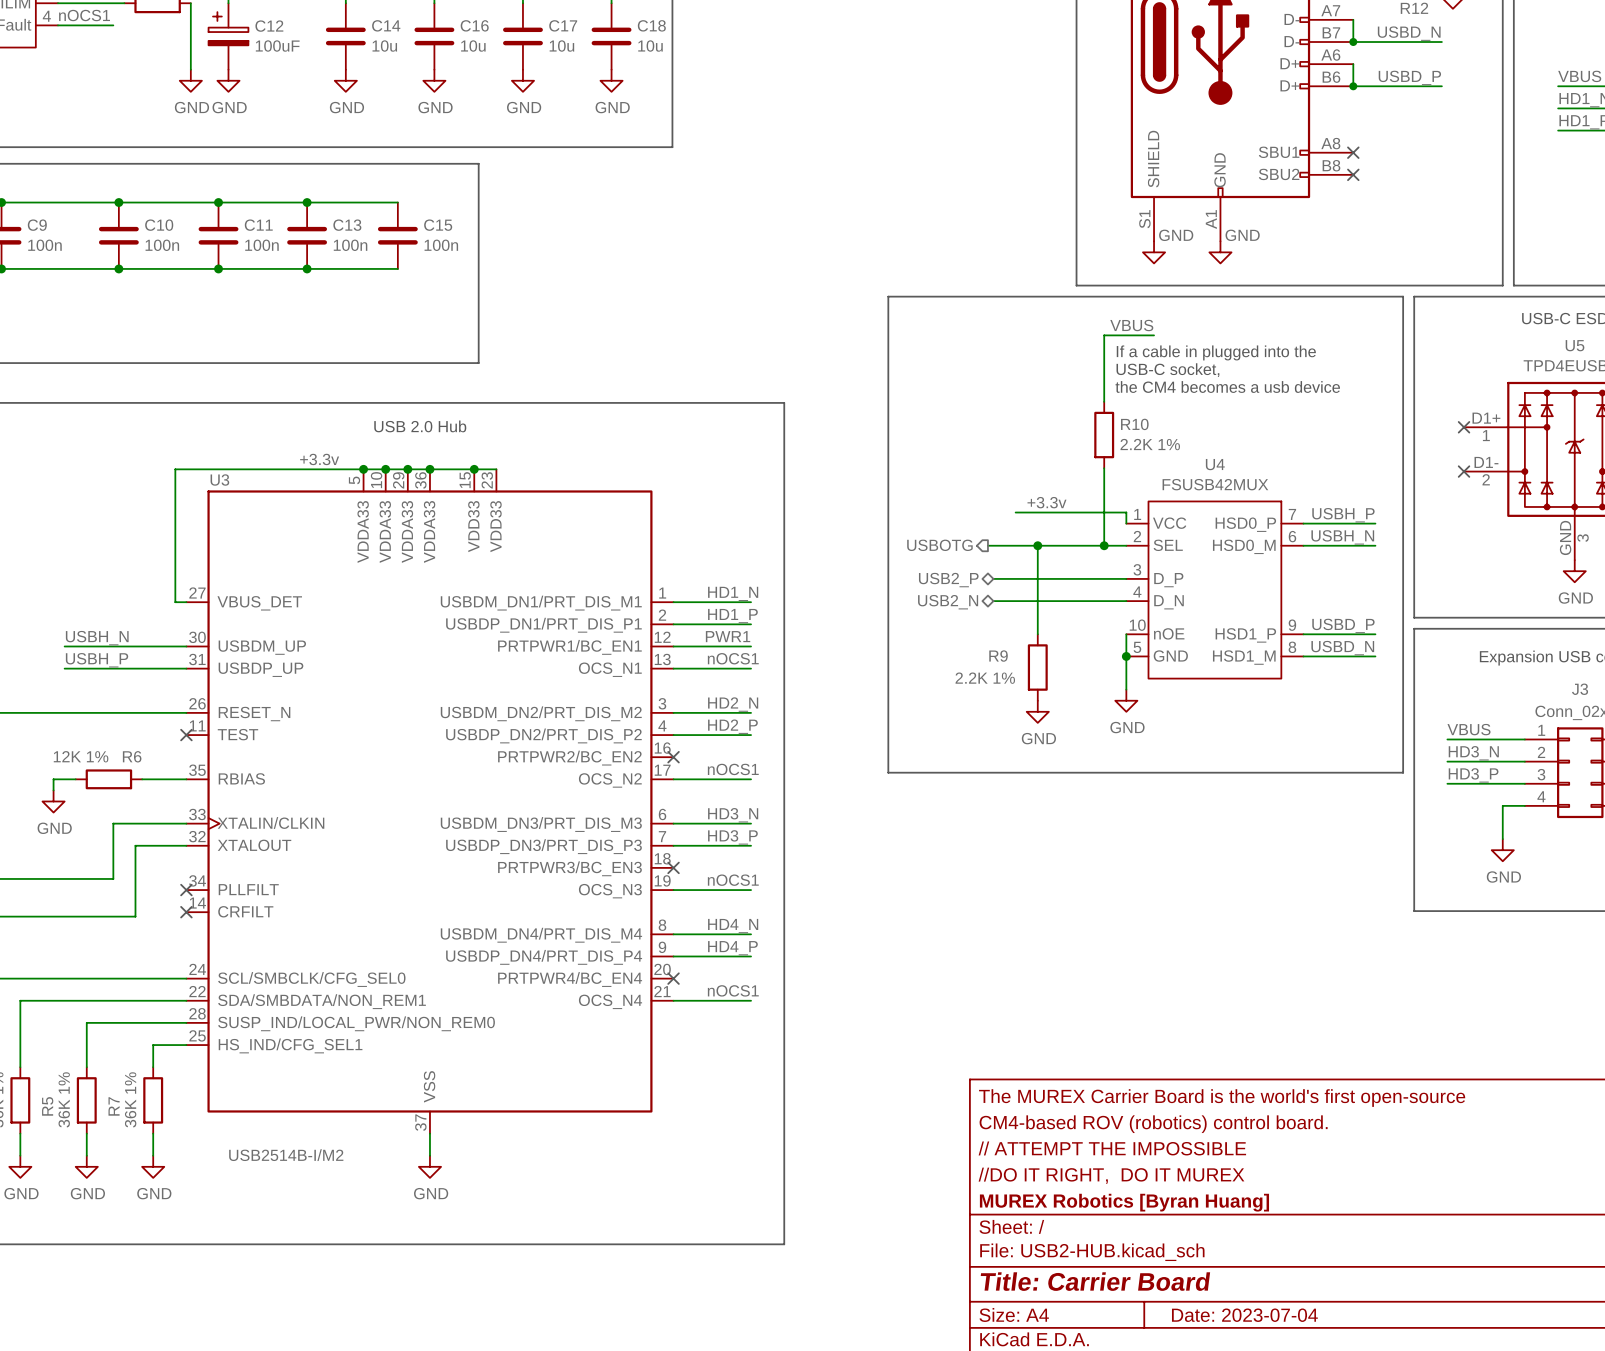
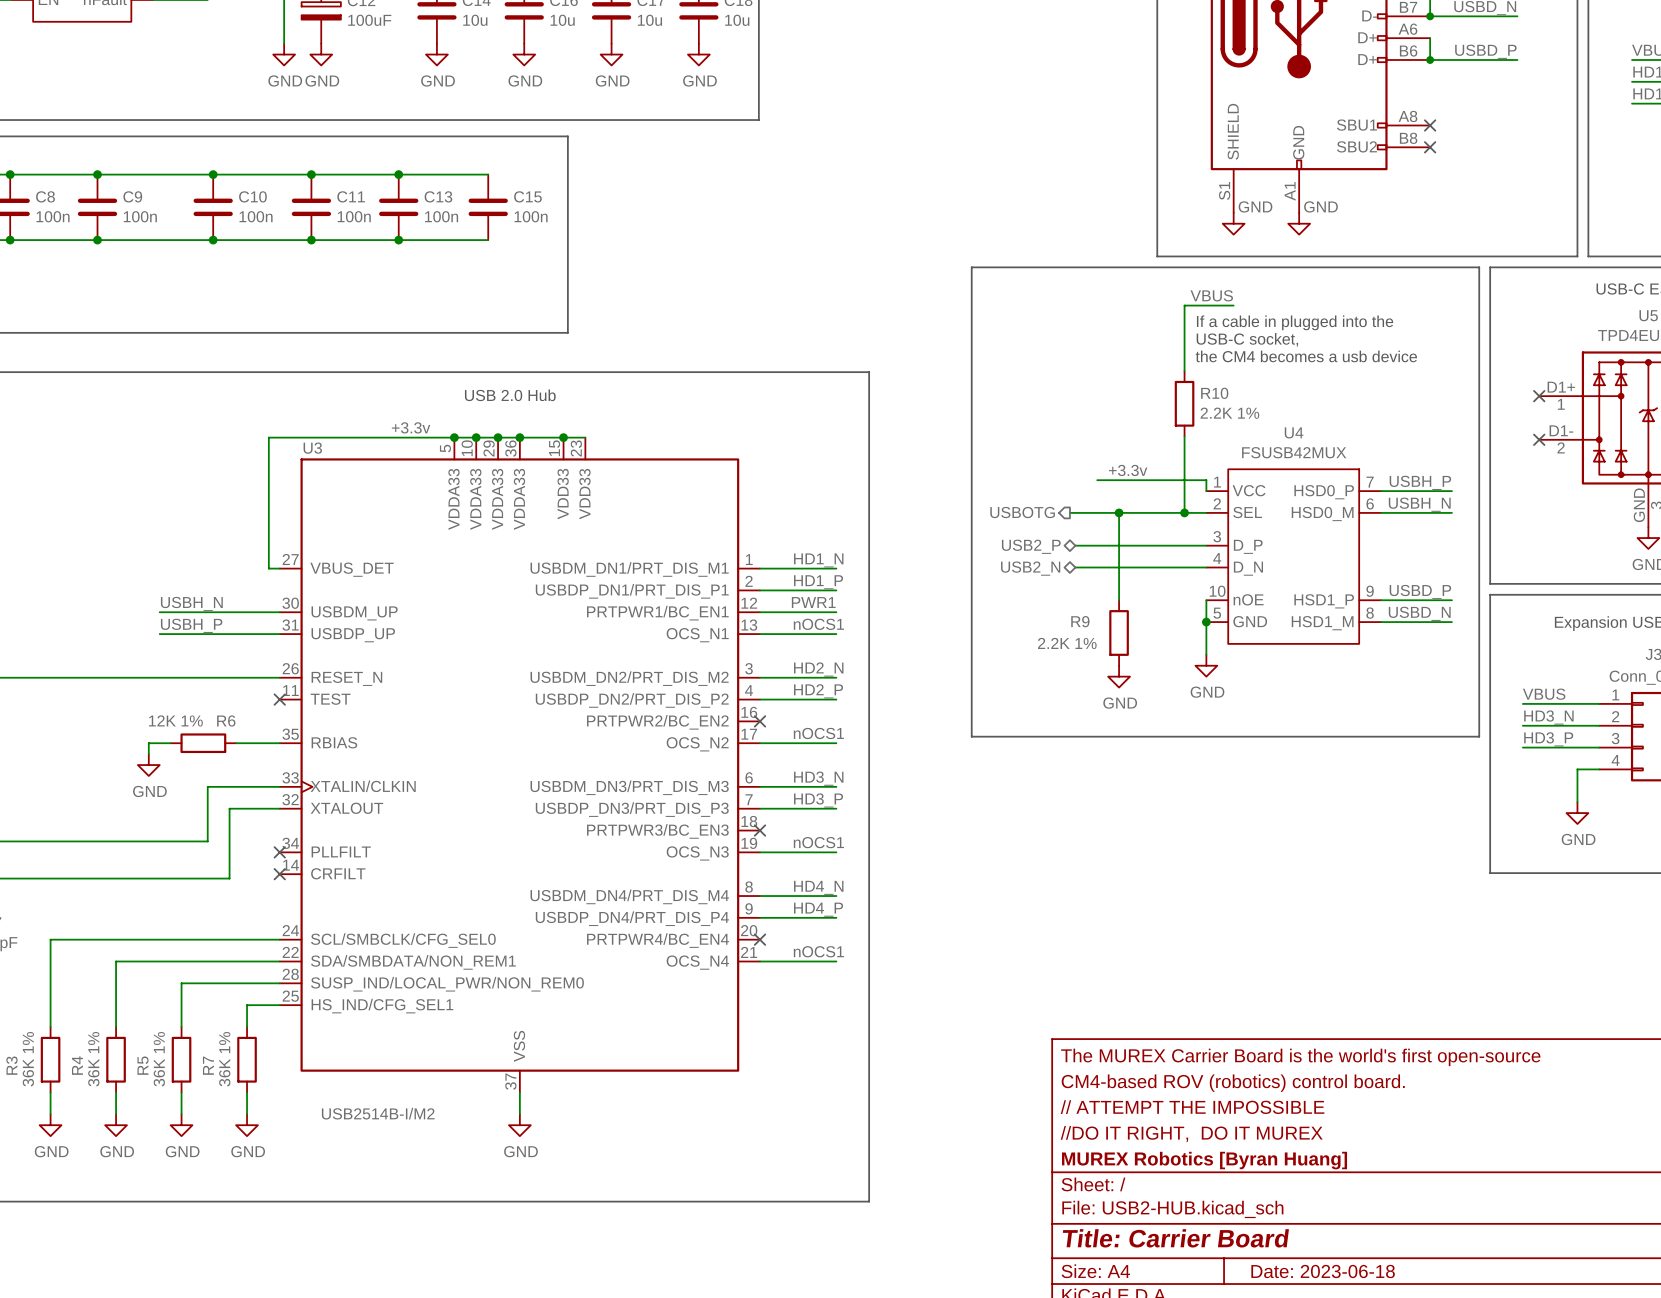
title block: Date: 2023-07-04 (1244, 1315) -> Date: 2023-06-18 (1323, 1271)

